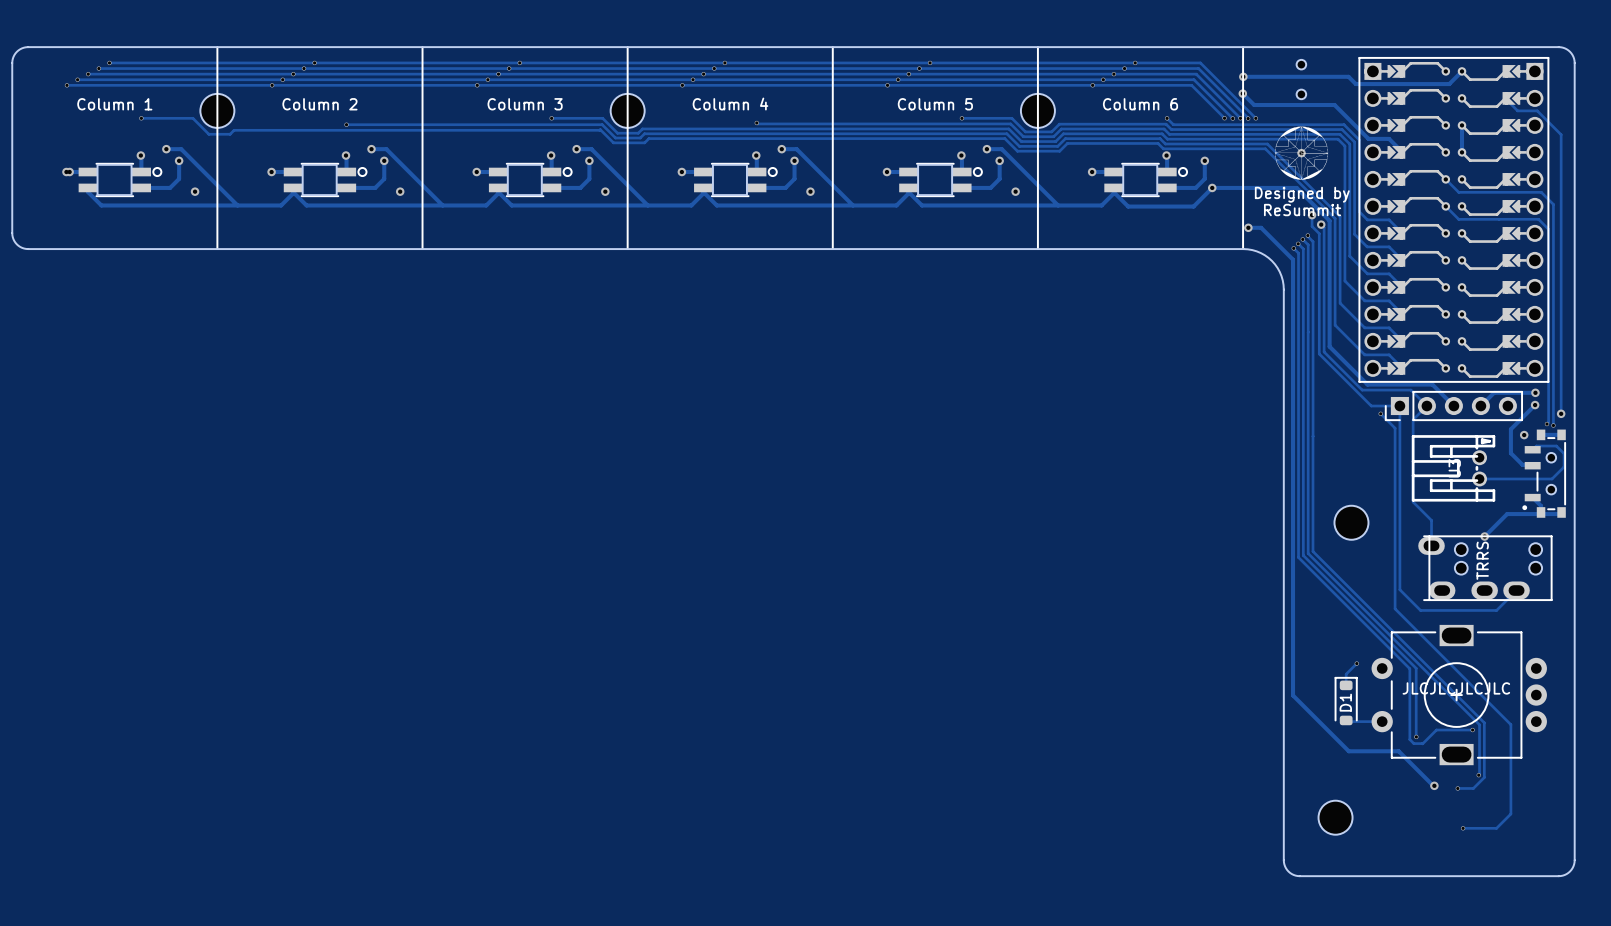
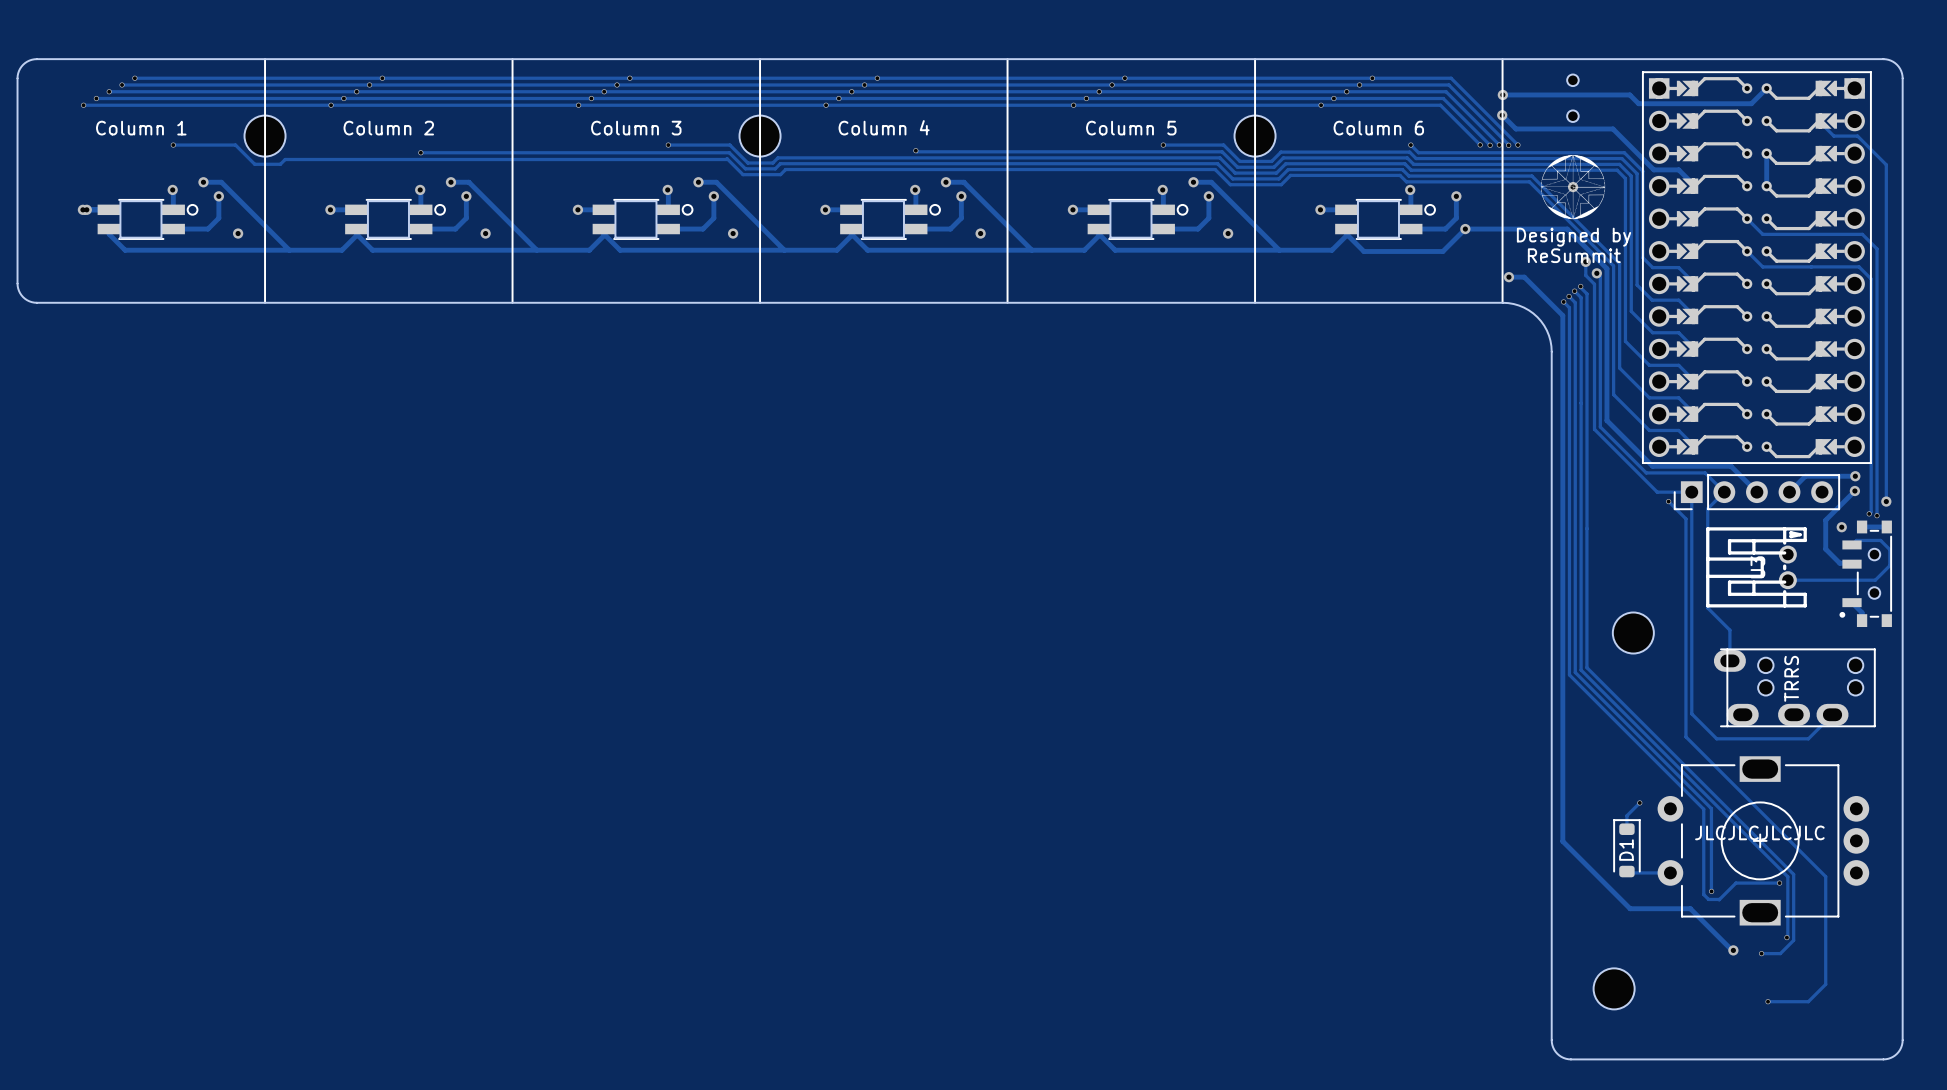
track: (1563, 513) (1507, 514) (1484, 536) -> none
via: (1484, 536) -> none

